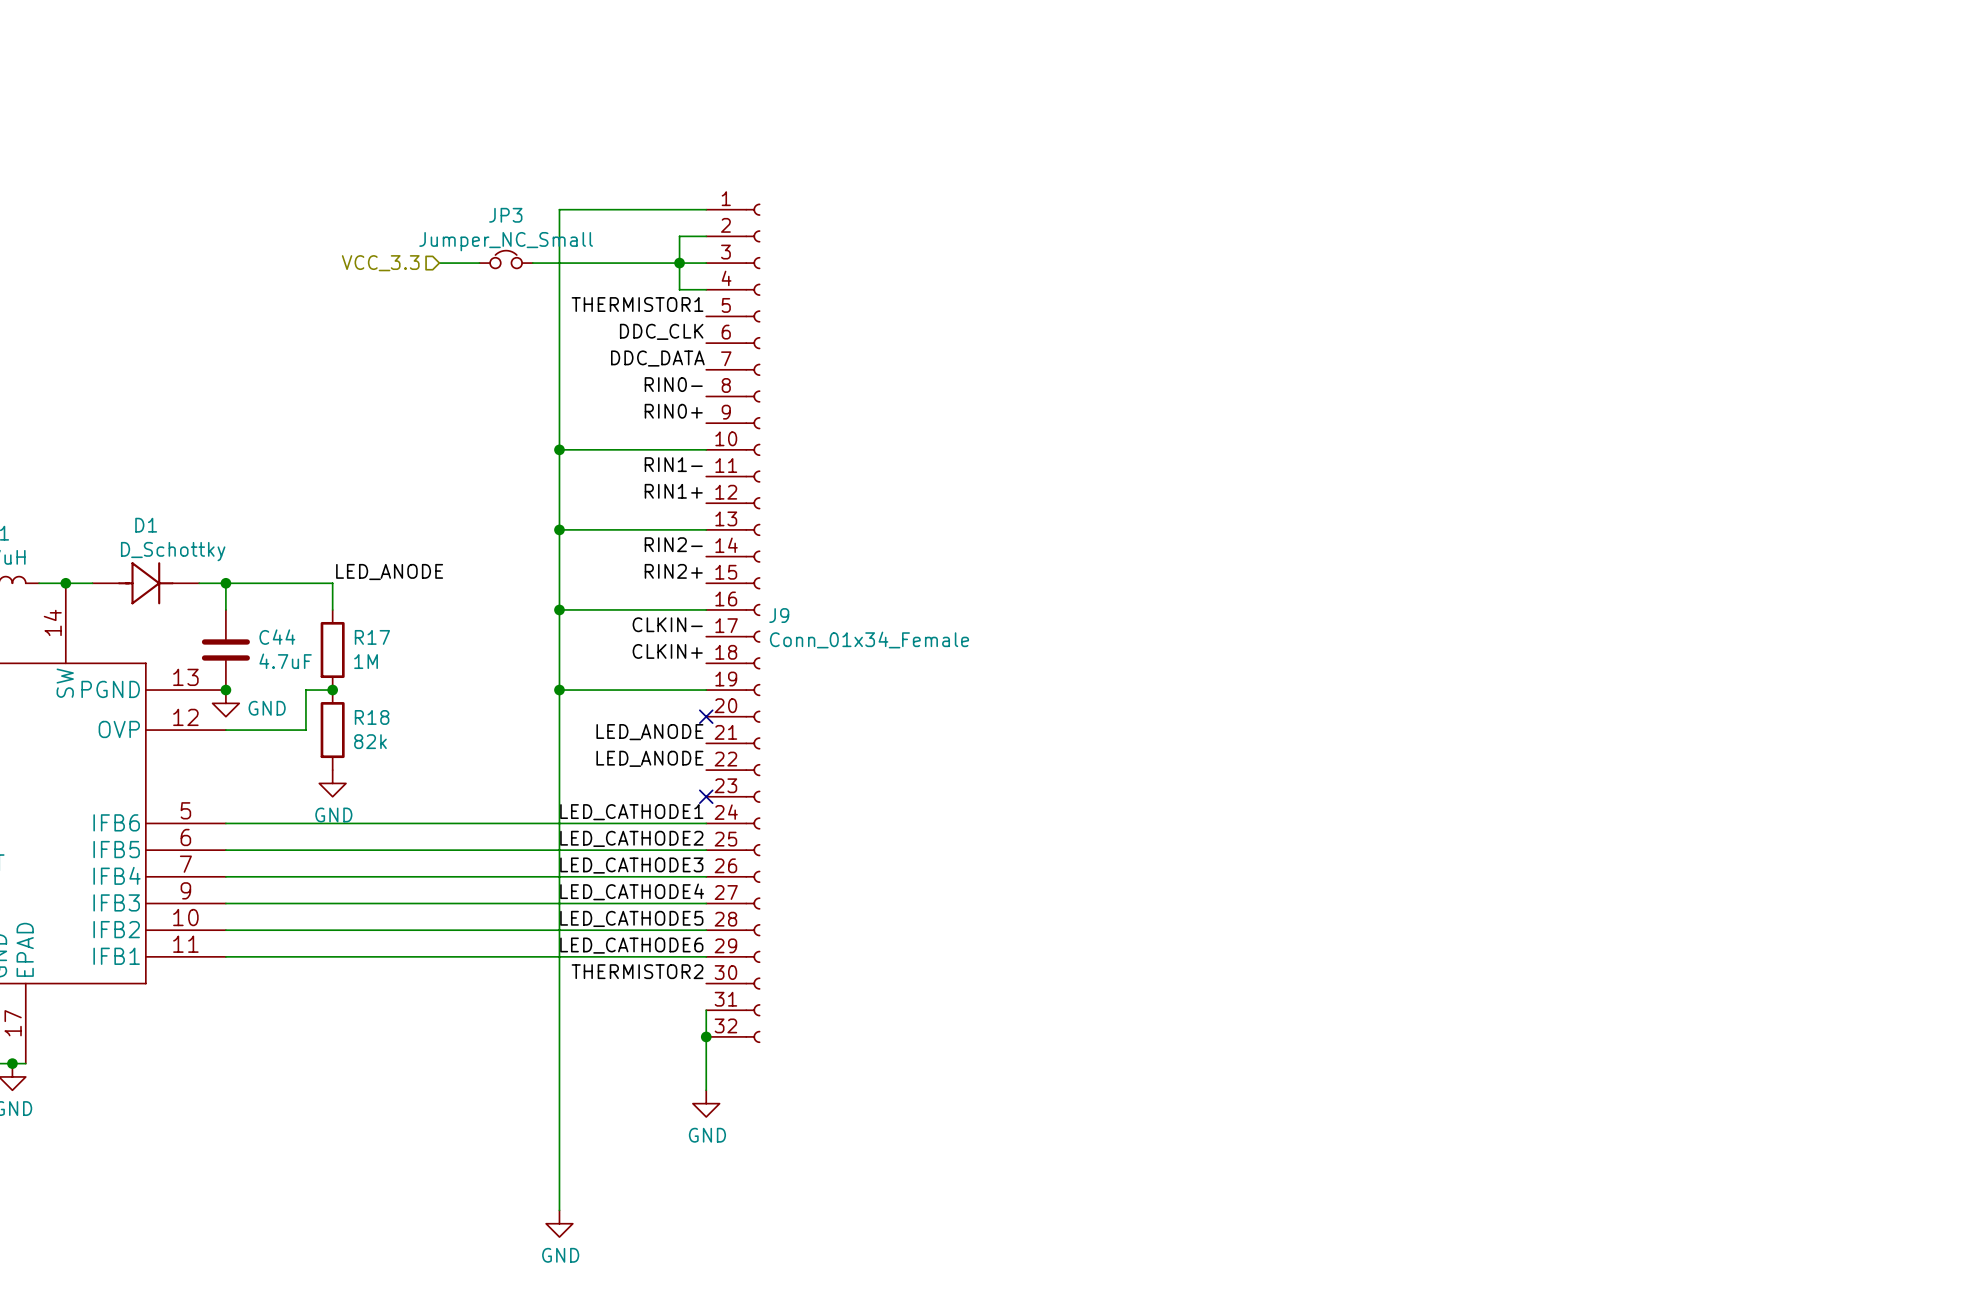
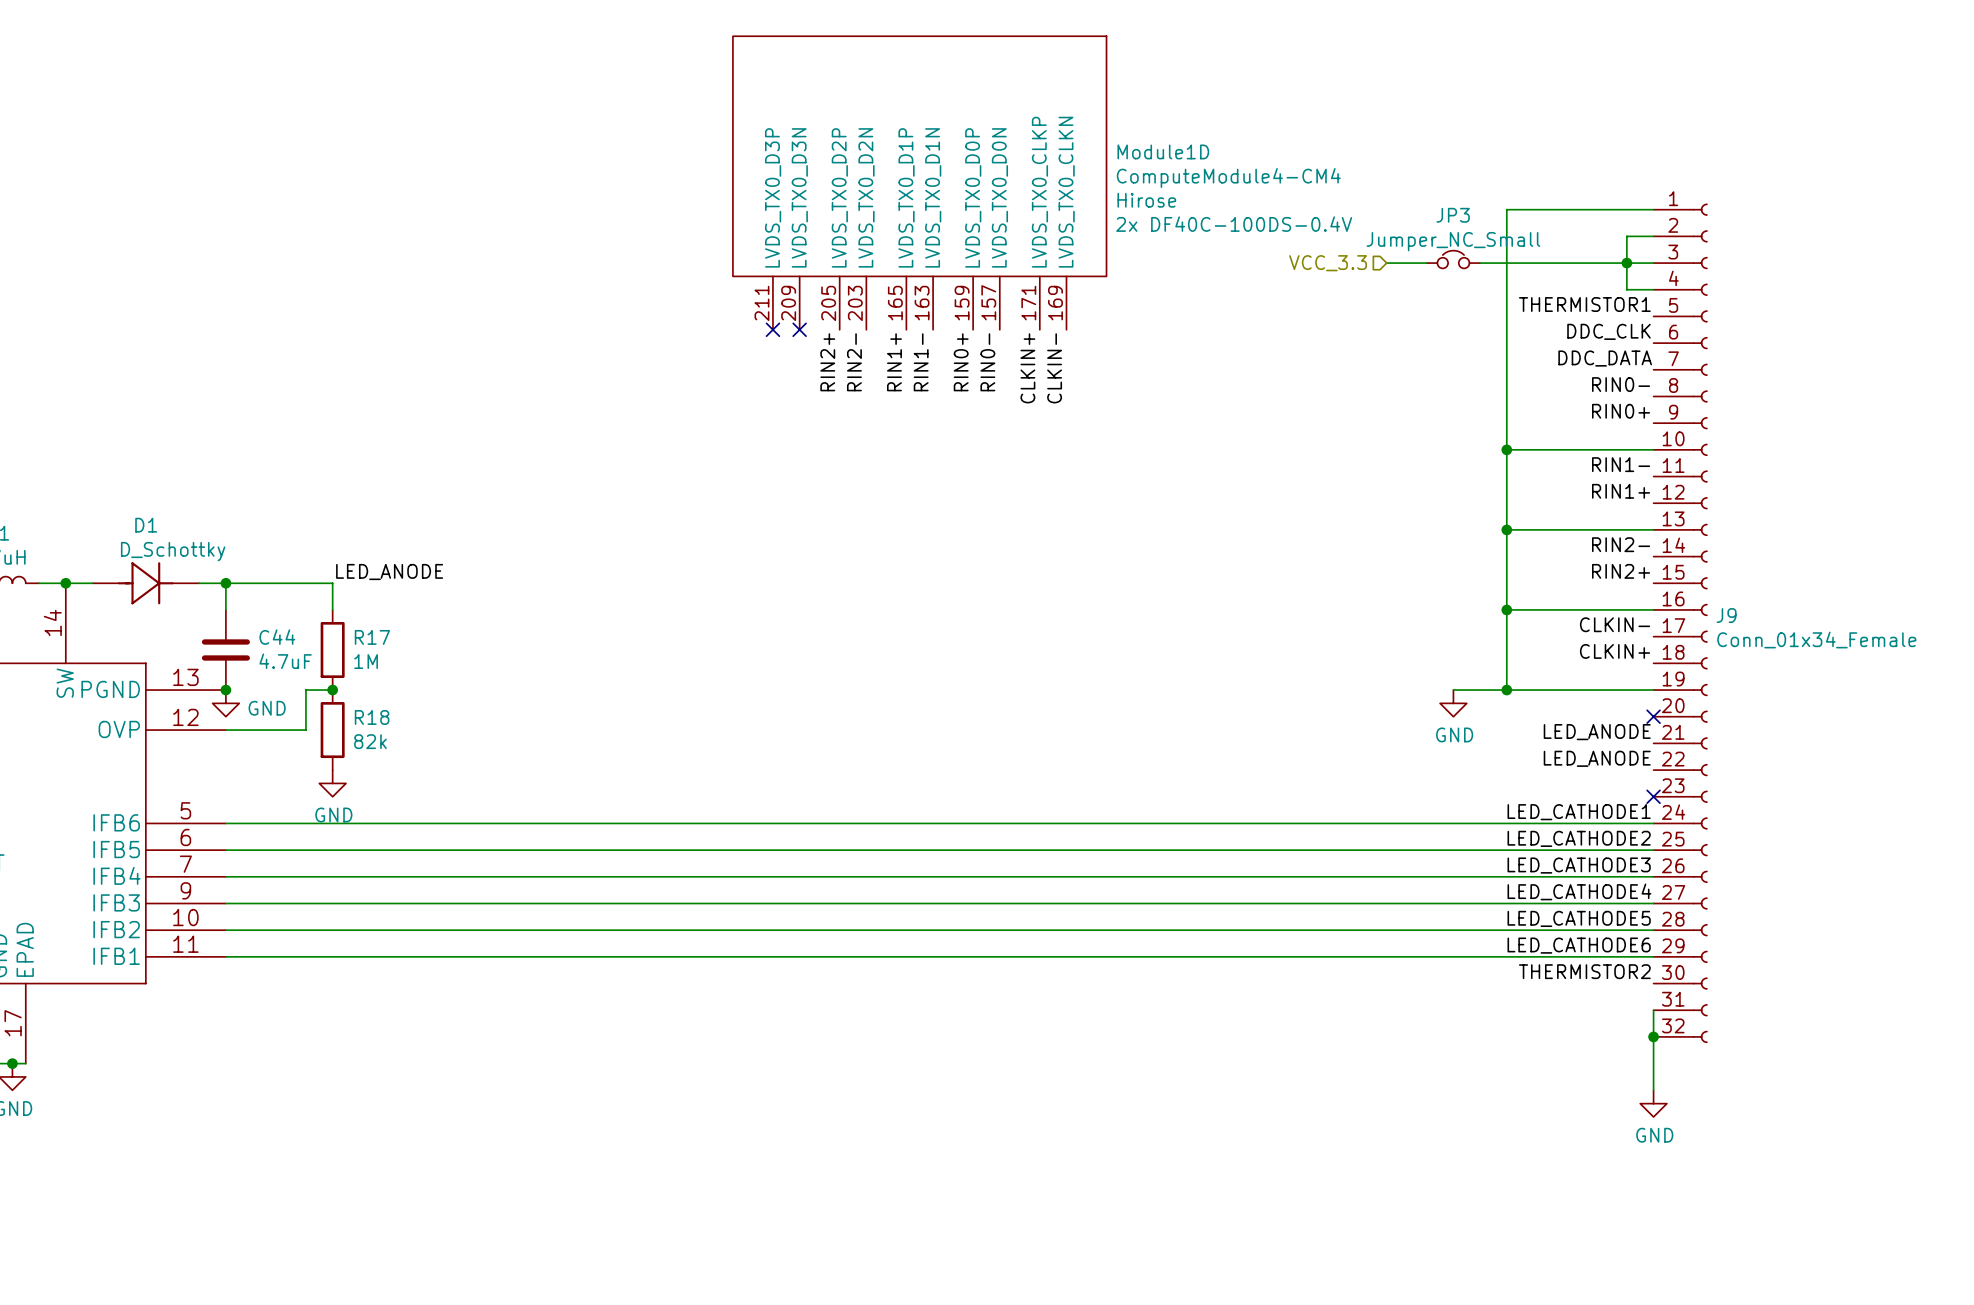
Module1D: none -> ComputeModule4-CM4 (919, 182)
wire: (706, 209) (559, 209) (559, 1210) -> none
wire: none -> (1653, 209) (1506, 209) (1506, 690)
wire: (706, 236) (679, 236) (679, 289) (706, 289) -> none
wire: none -> (1653, 236) (1626, 236) (1626, 289) (1653, 289)
JP3 position: (506, 259) -> (1453, 259)
hierarchical label: VCC_3.3 (380, 263) -> none
wire: (439, 263) (479, 263) -> none
wire: (532, 263) (706, 263) -> none
junction: (679, 263) -> none
hierarchical label: none -> VCC_3.3 (1328, 263)
wire: none -> (1386, 263) (1426, 263)
wire: none -> (1480, 263) (1653, 263)
junction: none -> (1626, 263)
label: THERMISTOR1 (637, 304) -> none
label: none -> THERMISTOR1 (1584, 304)
no-connect mark: none -> (772, 329)
no-connect mark: none -> (799, 329)
label: DDC_CLK (661, 331) -> none
label: none -> DDC_CLK (1608, 331)
label: DDC_DATA (657, 358) -> none
label: none -> DDC_DATA (1605, 358)
label: none -> RIN2+ (827, 362)
label: none -> RIN2- (854, 362)
label: none -> RIN1- (921, 362)
label: none -> RIN0+ (961, 362)
label: none -> RIN0- (987, 362)
label: none -> CLKIN+ (1027, 368)
label: none -> CLKIN- (1054, 368)
label: RIN0- (673, 384) -> none
label: none -> RIN0- (1621, 384)
label: RIN0+ (673, 411) -> none
label: none -> RIN0+ (1621, 411)
wire: (559, 449) (706, 449) -> none
junction: (559, 449) -> none
wire: none -> (1506, 449) (1653, 449)
junction: none -> (1506, 449)
label: RIN1- (673, 464) -> none
label: none -> RIN1- (1621, 464)
label rotation: 0° (673, 491) -> 90° counterclockwise (894, 362)
label position: RIN1+ (673, 491) -> RIN1+ (894, 362)
label: none -> RIN1+ (1621, 491)
wire: (559, 529) (706, 529) -> none
junction: (559, 529) -> none
wire: none -> (1506, 529) (1653, 529)
junction: none -> (1506, 529)
label: RIN2- (673, 544) -> none
label: none -> RIN2- (1621, 544)
label: RIN2+ (673, 571) -> none
label: none -> RIN2+ (1621, 571)
wire: (559, 609) (706, 609) -> none
junction: (559, 609) -> none
wire: none -> (1506, 609) (1653, 609)
junction: none -> (1506, 609)
J9 position: (733, 623) -> (1680, 623)
label: CLKIN- (667, 624) -> none
label: none -> CLKIN- (1615, 624)
label: CLKIN+ (667, 651) -> none
label: none -> CLKIN+ (1615, 651)
wire: (559, 690) (706, 690) -> none
junction: (559, 690) -> none
wire: none -> (1453, 690) (1653, 690)
junction: none -> (1506, 690)
power symbol: none -> GND (1453, 703)
no-connect mark: (706, 716) -> none
no-connect mark: none -> (1653, 716)
label: LED_ANODE (649, 732) -> none
label: none -> LED_ANODE (1597, 732)
label: LED_ANODE (649, 758) -> none
label: none -> LED_ANODE (1597, 758)
no-connect mark: (706, 796) -> none
no-connect mark: none -> (1653, 796)
label: LED_CATHODE1 (631, 812) -> none
label: none -> LED_CATHODE1 (1579, 812)
wire: none -> (706, 823) (1653, 823)
label: LED_CATHODE2 (631, 838) -> none
label: none -> LED_CATHODE2 (1579, 838)
wire: none -> (706, 850) (1653, 850)
label: LED_CATHODE3 (631, 865) -> none
label: none -> LED_CATHODE3 (1579, 865)
wire: none -> (706, 876) (1653, 876)
label: LED_CATHODE4 (632, 891) -> none
label: none -> LED_CATHODE4 (1579, 891)
wire: none -> (706, 903) (1653, 903)
label: LED_CATHODE5 (631, 918) -> none
label: none -> LED_CATHODE5 (1579, 918)
wire: none -> (706, 930) (1653, 930)
label: LED_CATHODE6 (631, 945) -> none
label: none -> LED_CATHODE6 (1579, 945)
wire: none -> (706, 956) (1653, 956)
label: THERMISTOR2 (637, 971) -> none
label: none -> THERMISTOR2 (1584, 971)
wire: (706, 1010) (706, 1090) -> none
wire: none -> (1653, 1010) (1653, 1090)
junction: (706, 1036) -> none
junction: none -> (1653, 1036)
power symbol: GND (706, 1103) -> none
power symbol: none -> GND (1653, 1103)
power symbol: GND (559, 1223) -> none

